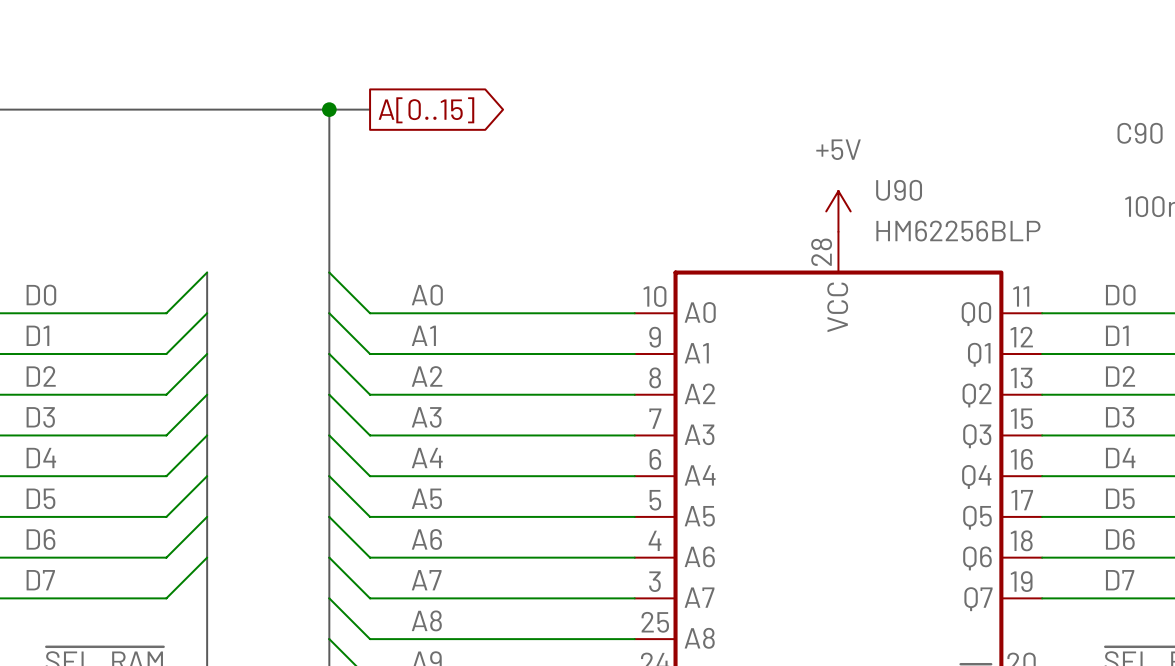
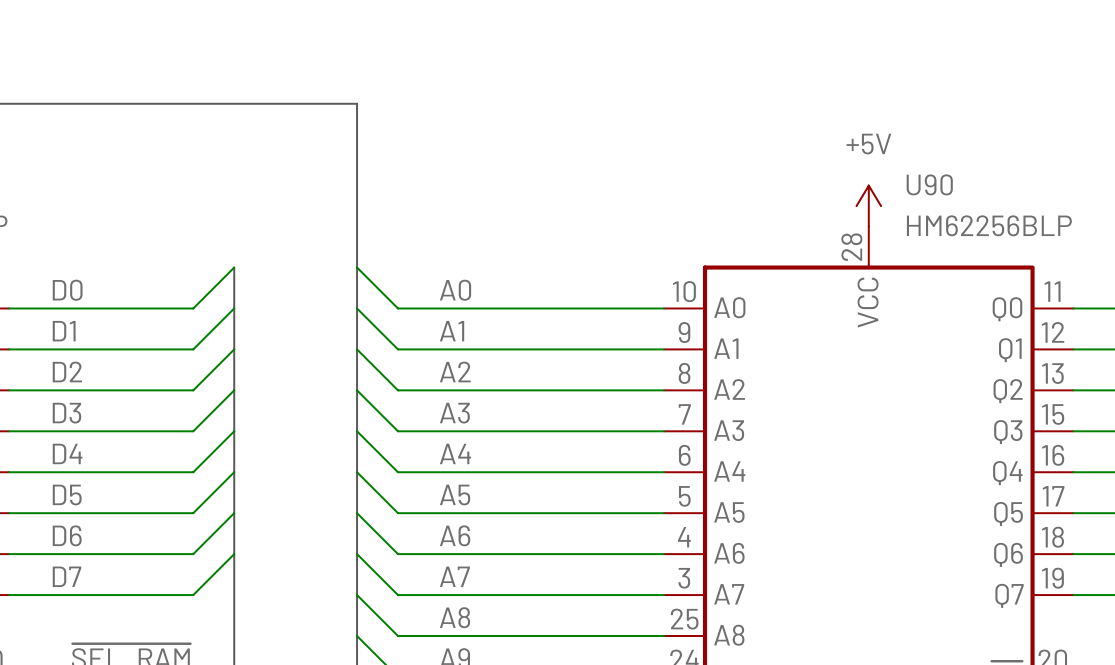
bus: (329, 109) (370, 109) -> none
junction: (329, 109) -> none
global label: A[0..15] (426, 110) -> none

